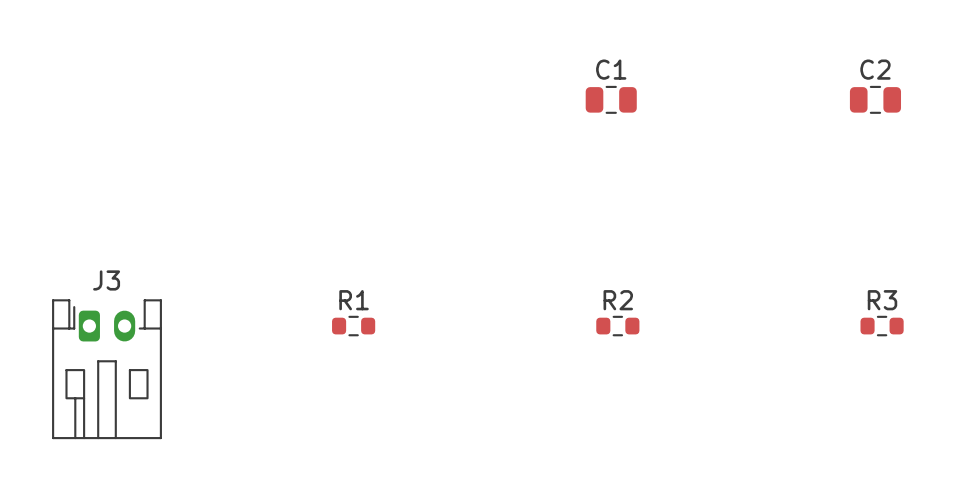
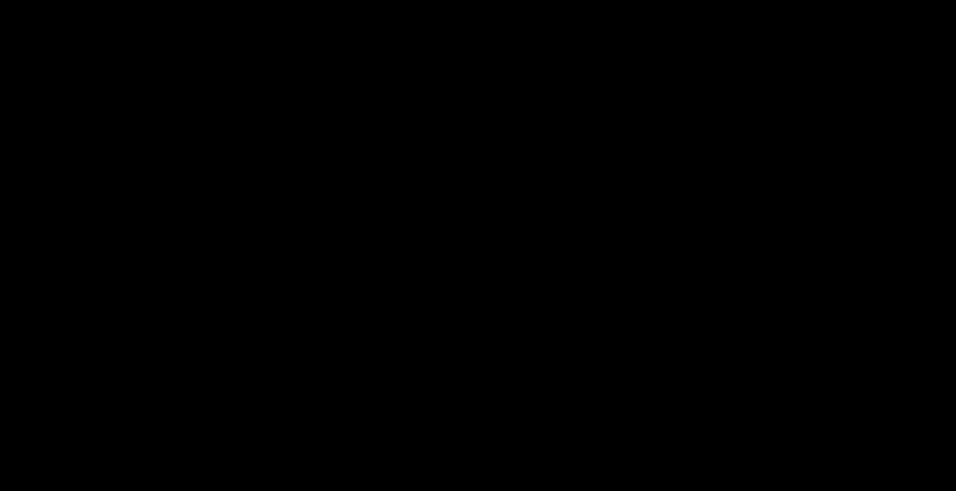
C1: (611, 99) -> none
C2: (875, 99) -> none
R1: (353, 326) -> none
R2: (617, 326) -> none
R3: (882, 326) -> none
J3: (107, 369) -> none

